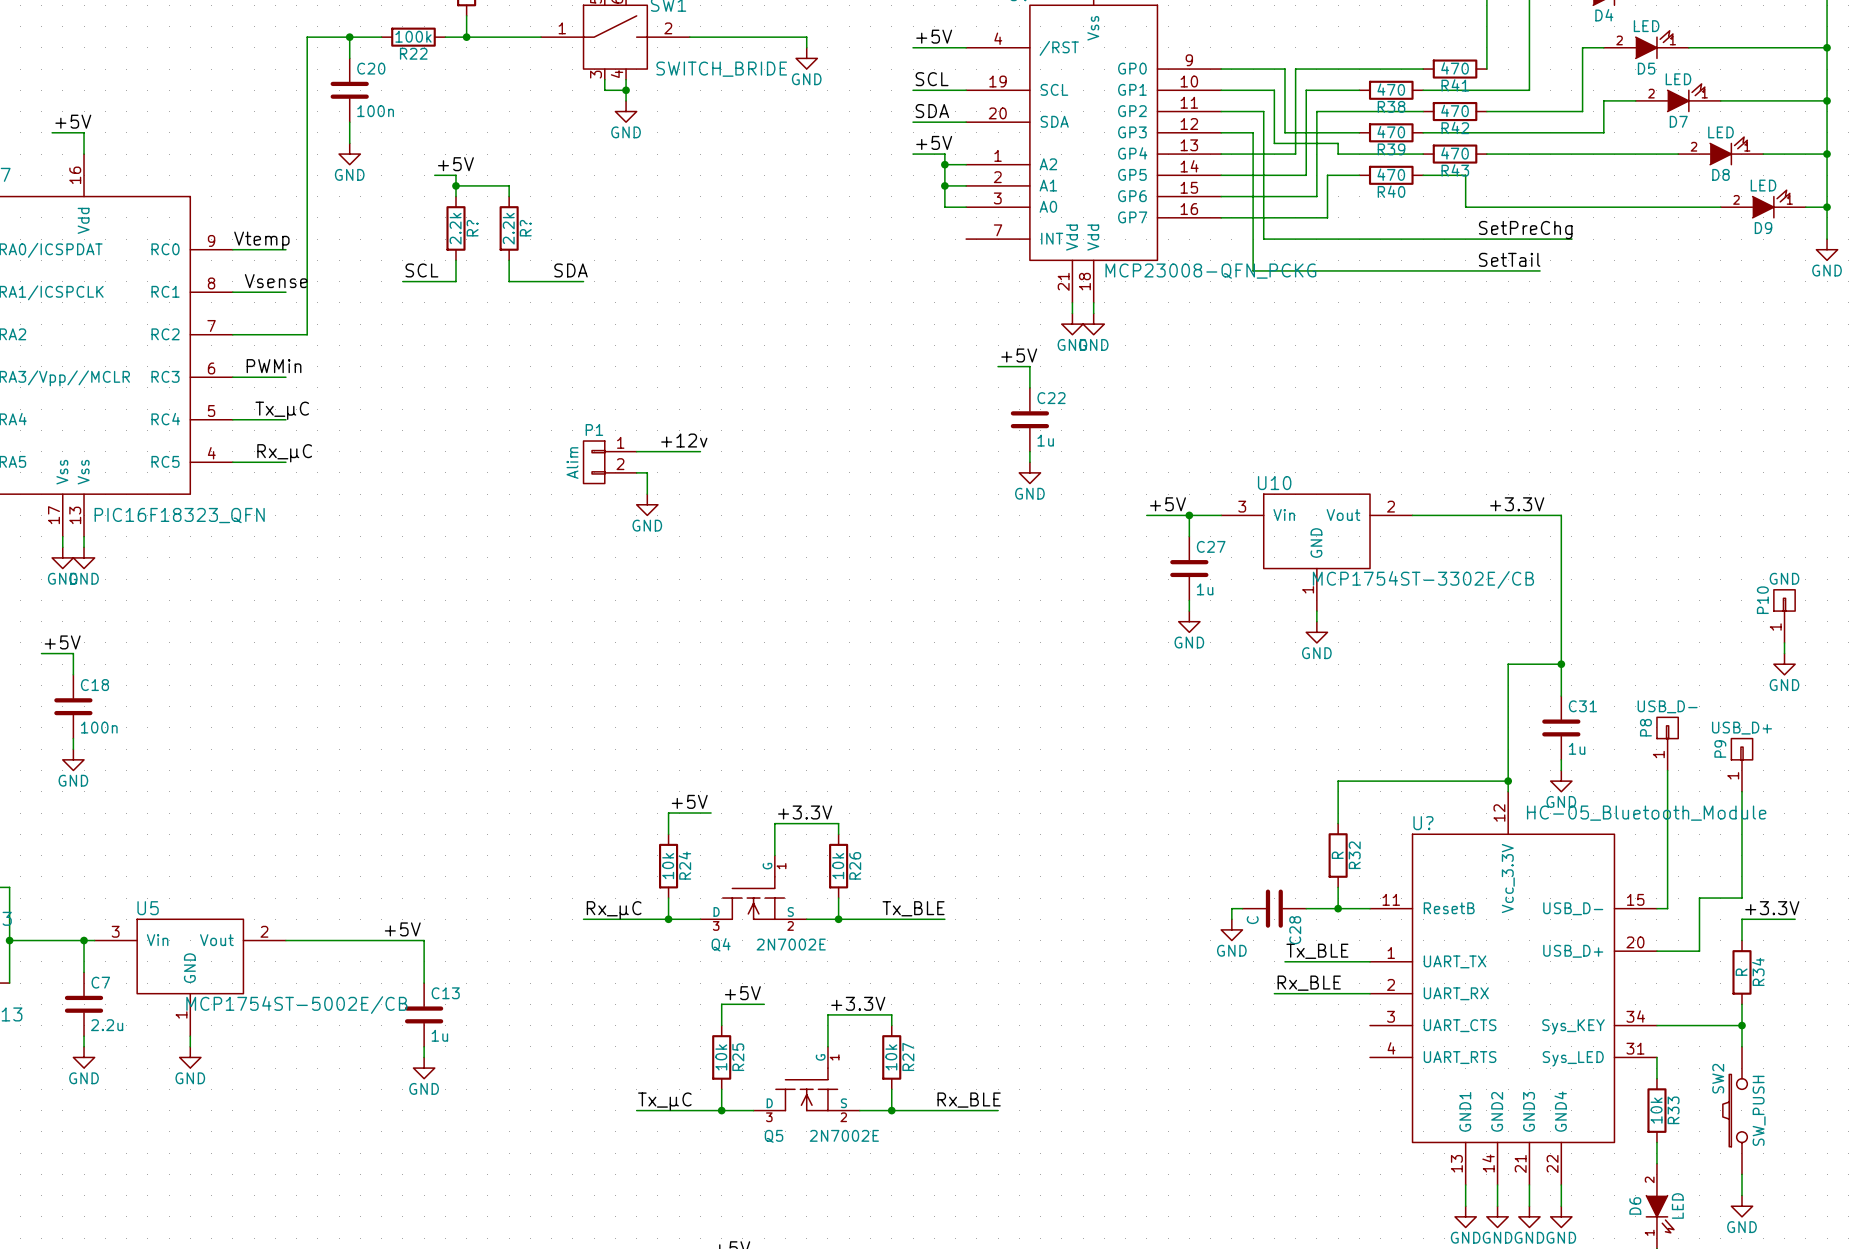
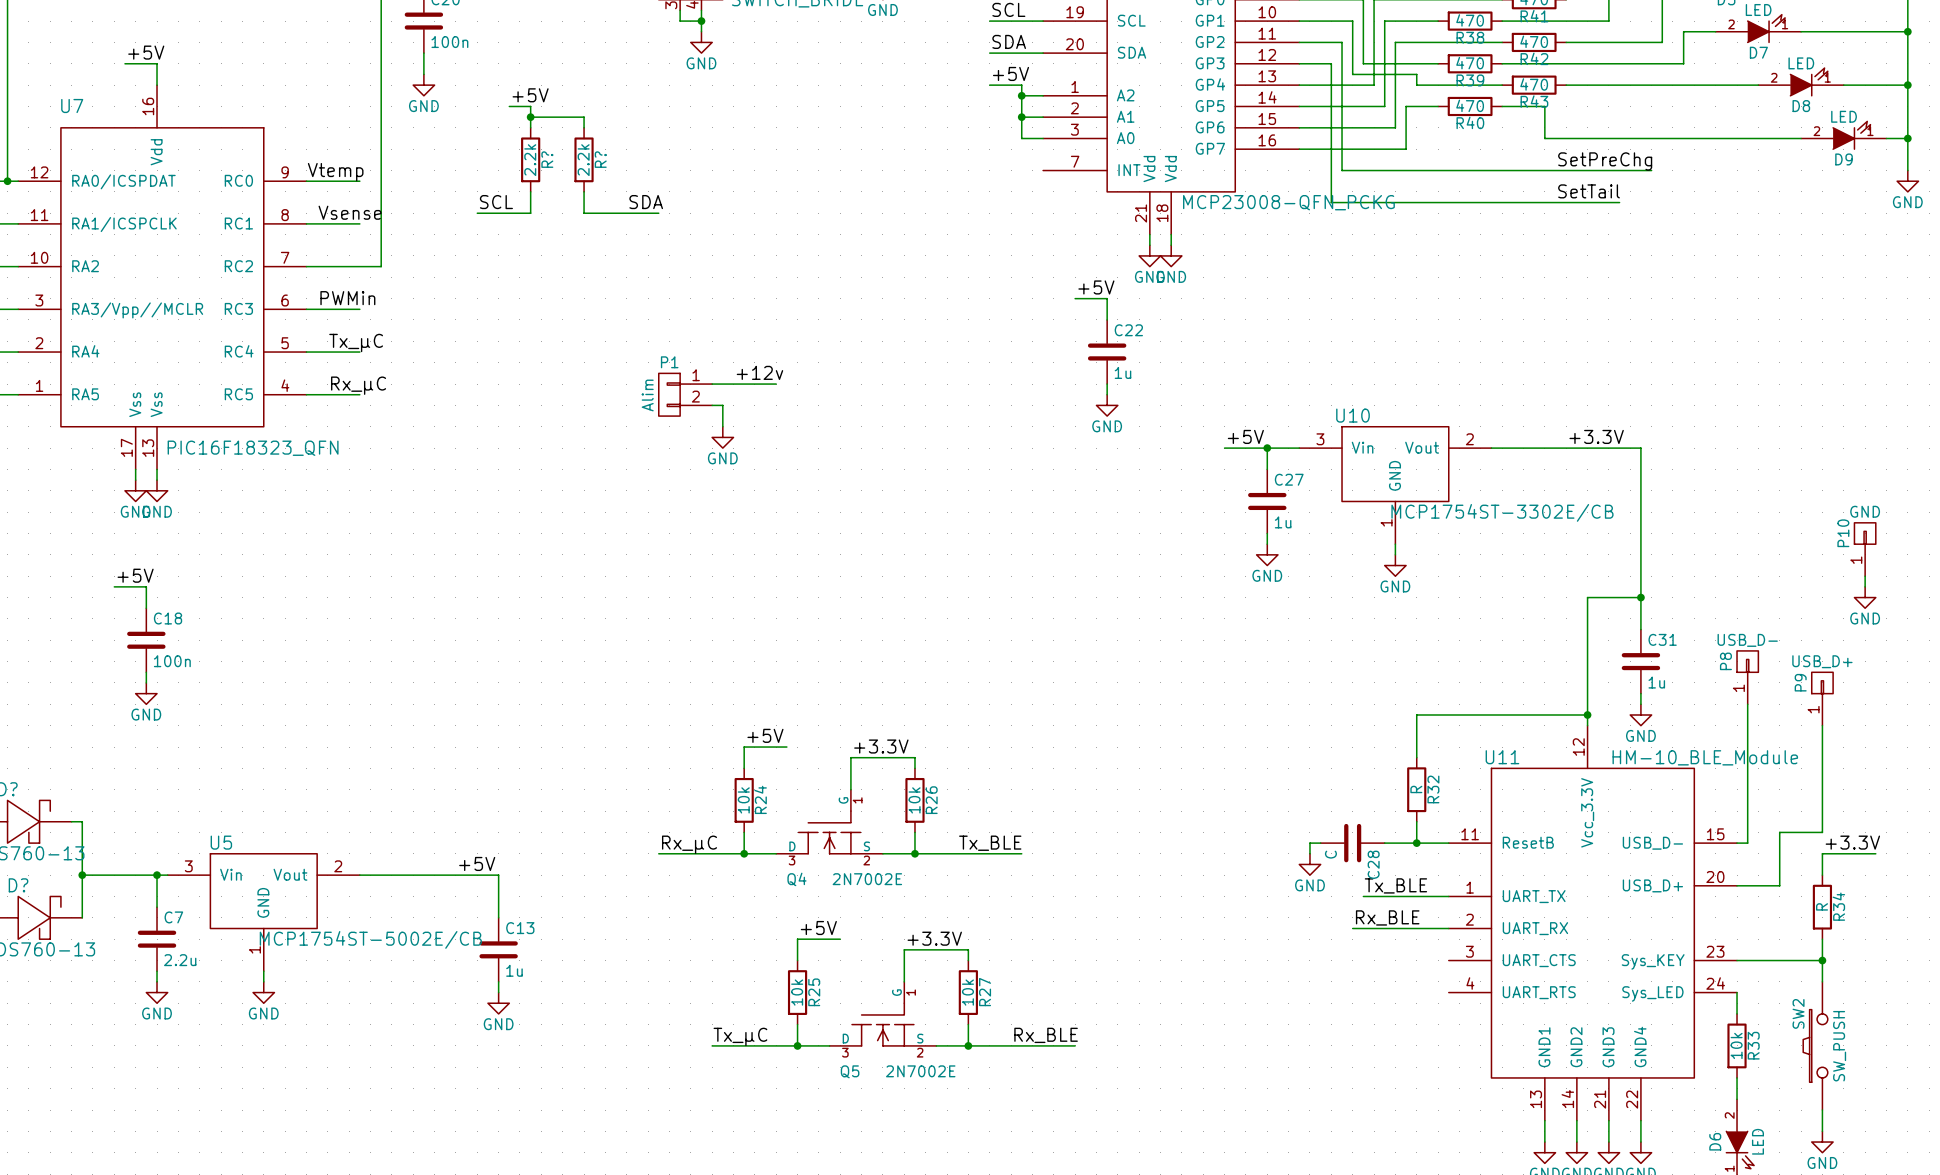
U? value: HC-05_Bluetooth_Module (1646, 813) -> HM-10_BLE_Module (1705, 757)
U? name: U? (1423, 823) -> U11 (1502, 757)
U? pin number: 34 (1635, 1016) -> 23 (1715, 951)
U? pin number: 31 (1635, 1048) -> 24 (1715, 983)

